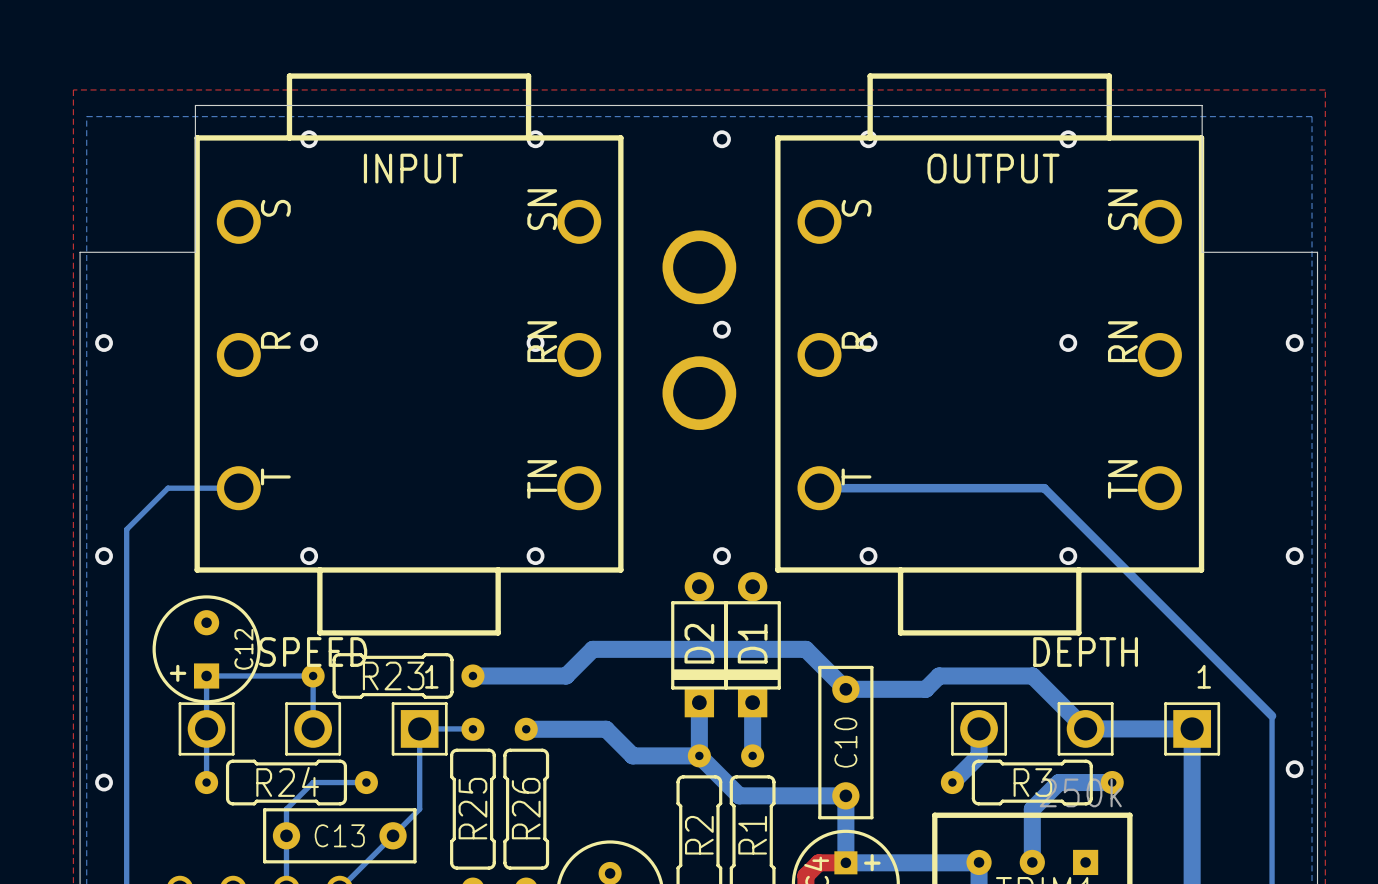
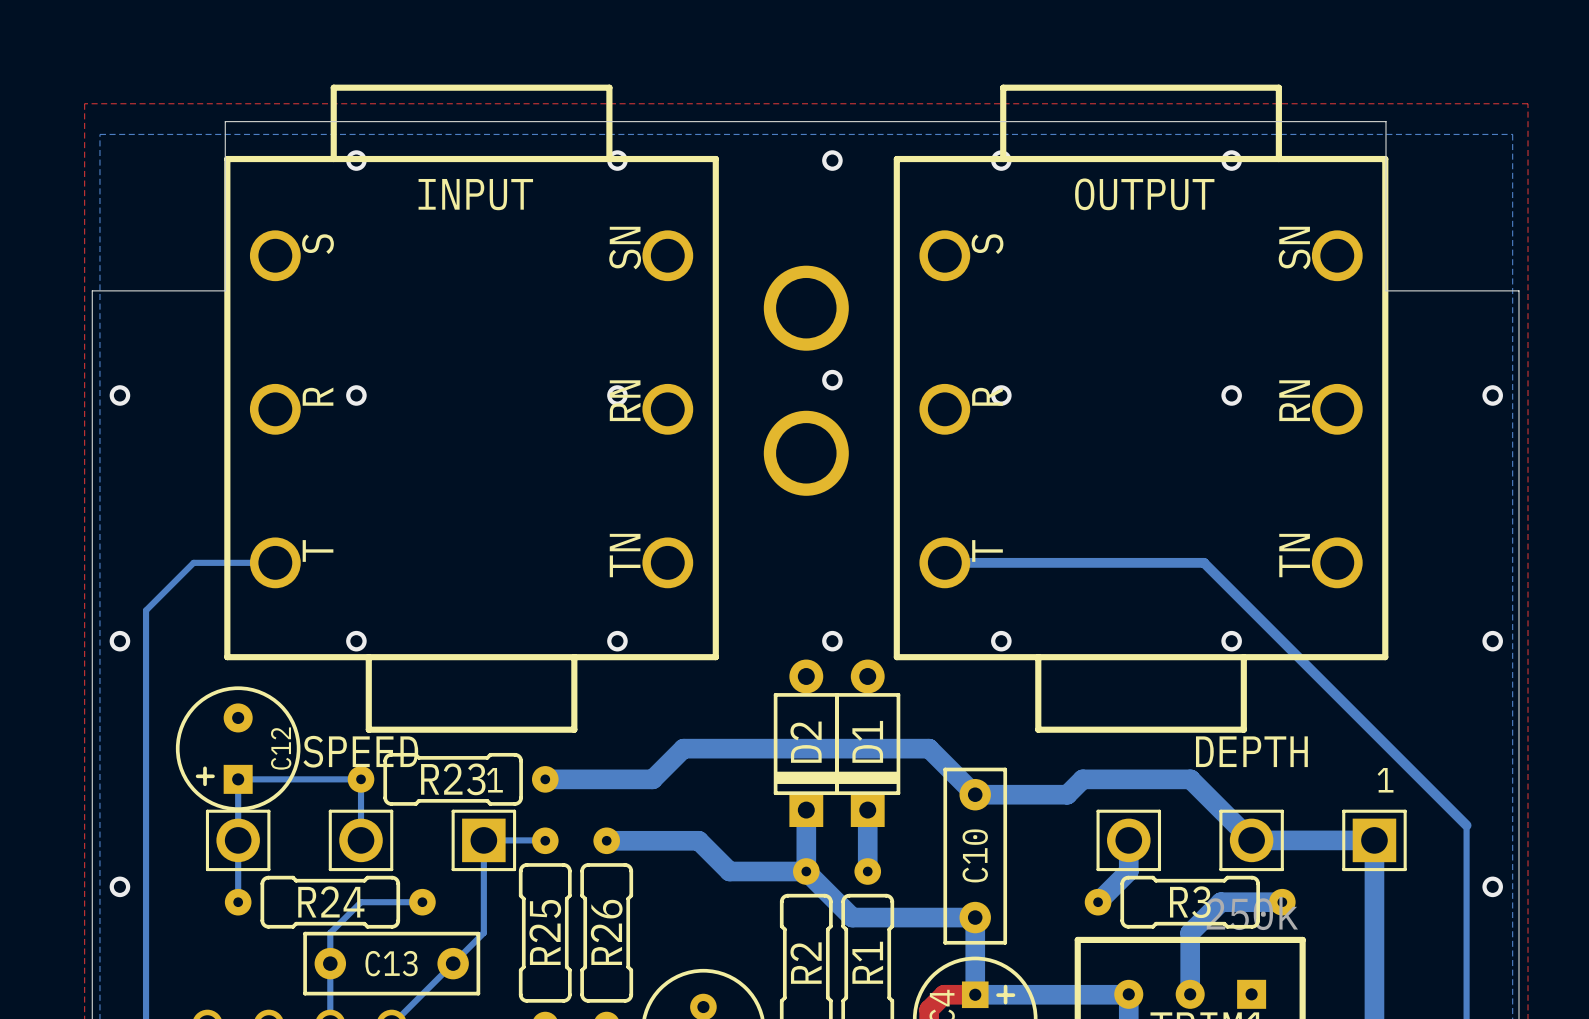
via position: (104, 782) -> (119, 886)

